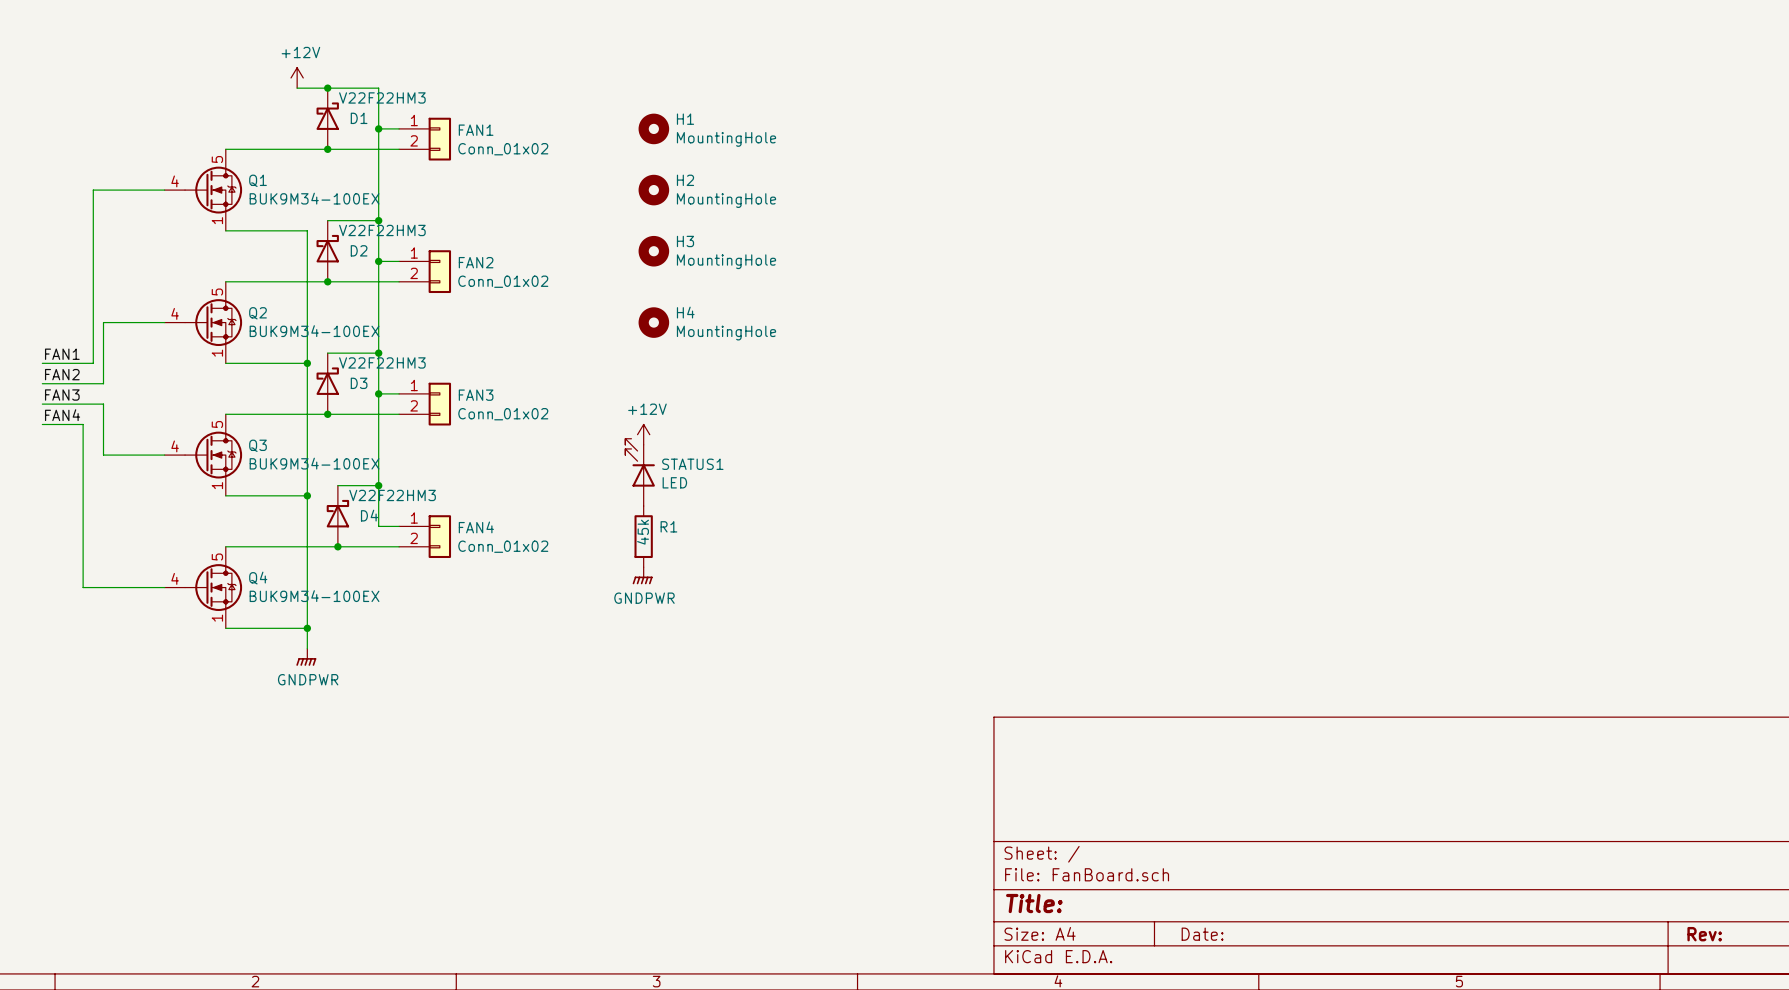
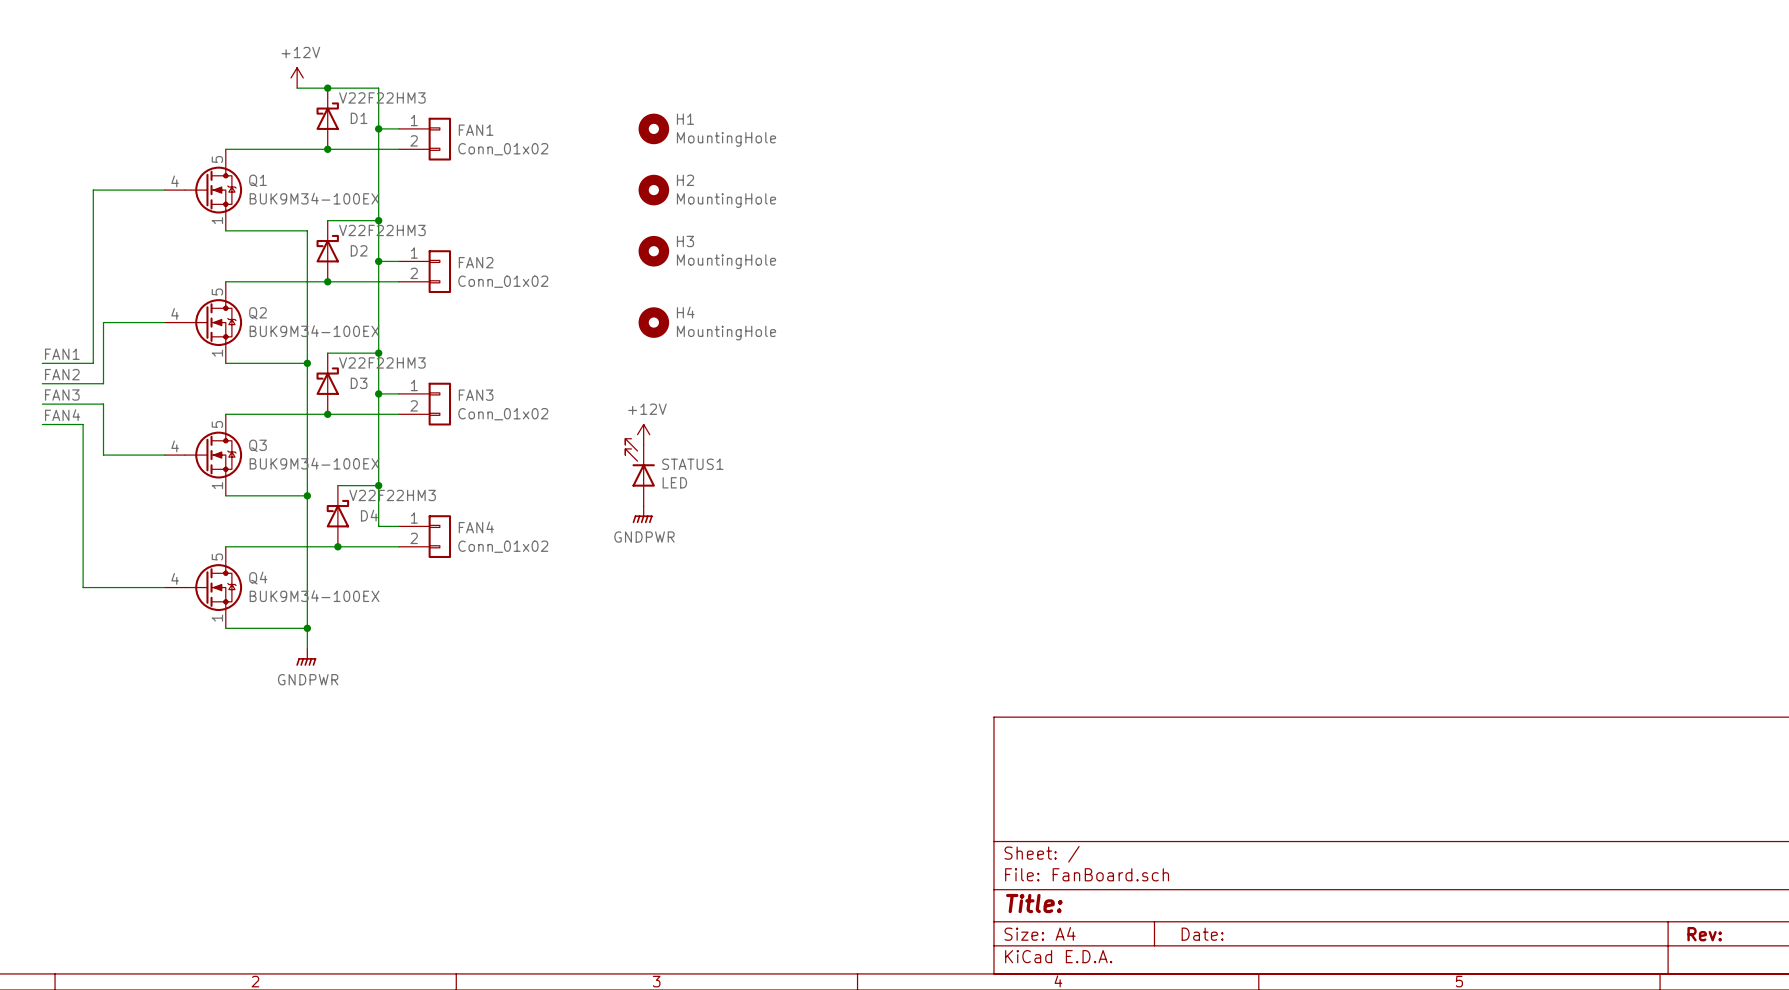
R1: 45k (643, 536) -> none
power symbol position: GNDPWR (642, 575) -> GNDPWR (642, 514)

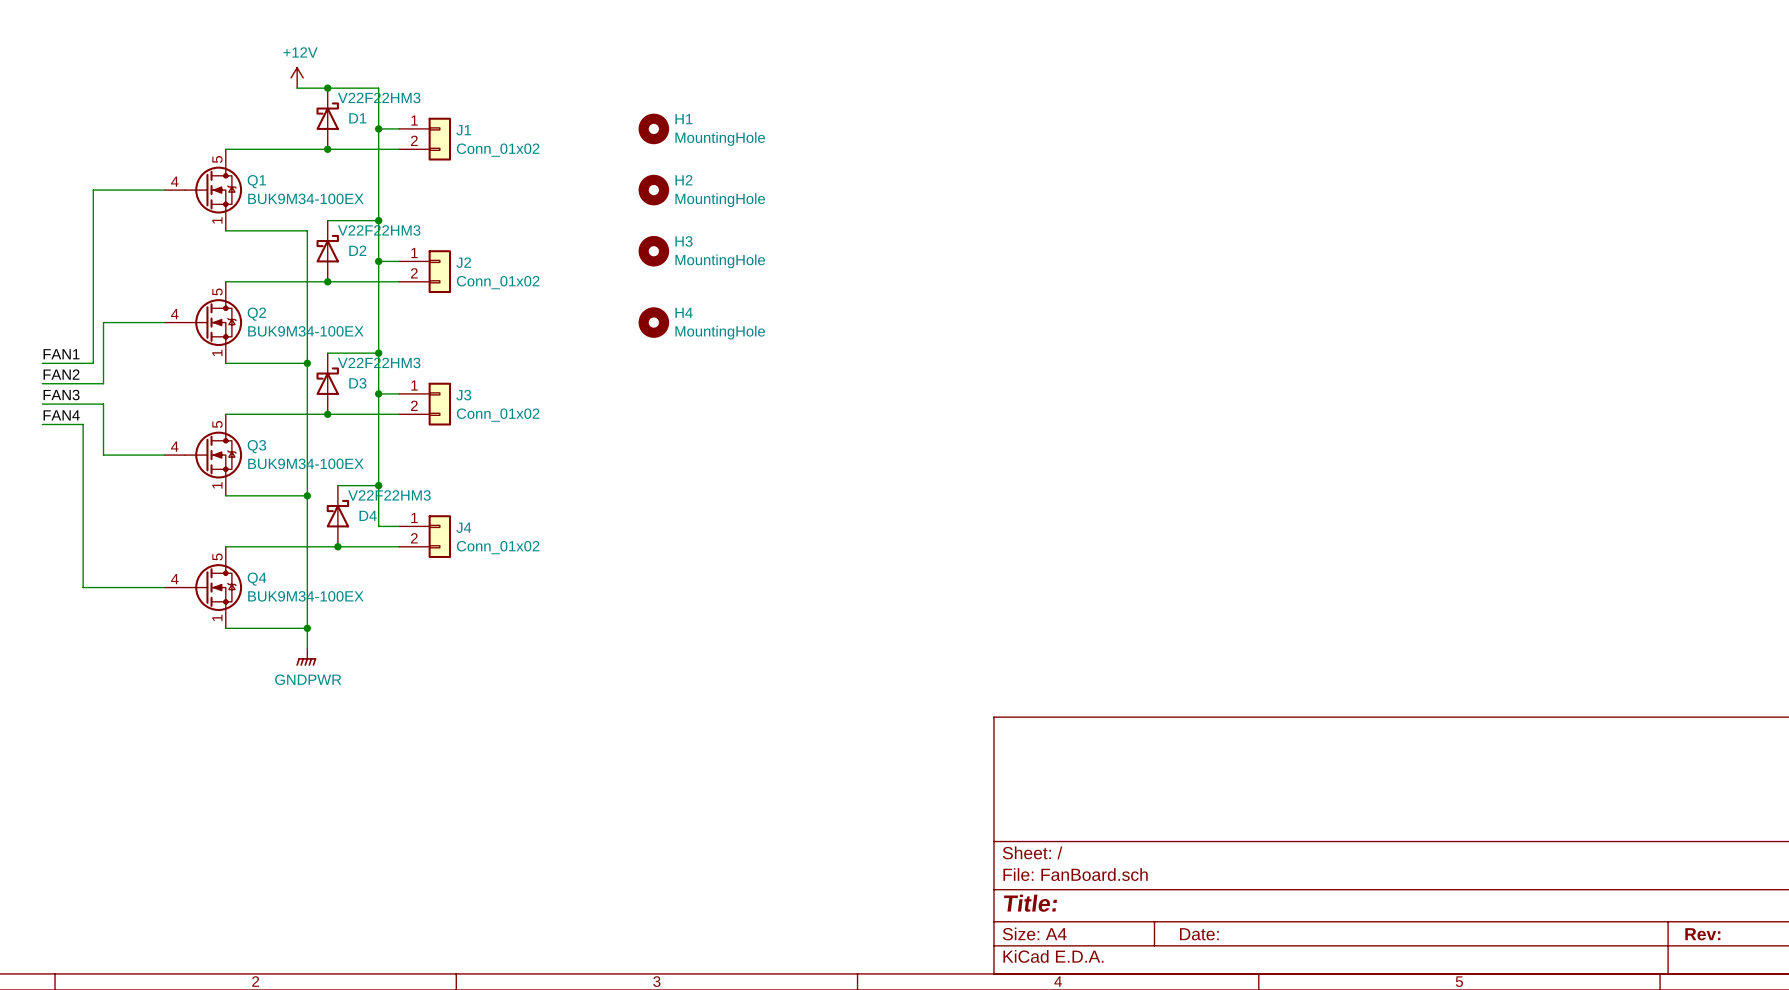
FAN1 name: FAN1 (476, 130) -> J1 (463, 130)
FAN2 name: FAN2 (476, 262) -> J2 (463, 262)
FAN3 name: FAN3 (476, 395) -> J3 (463, 395)
power symbol: +12V (643, 434) -> none
STATUS1: LED (640, 472) -> none
power symbol: GNDPWR (642, 514) -> none
FAN4 name: FAN4 (476, 527) -> J4 (463, 527)

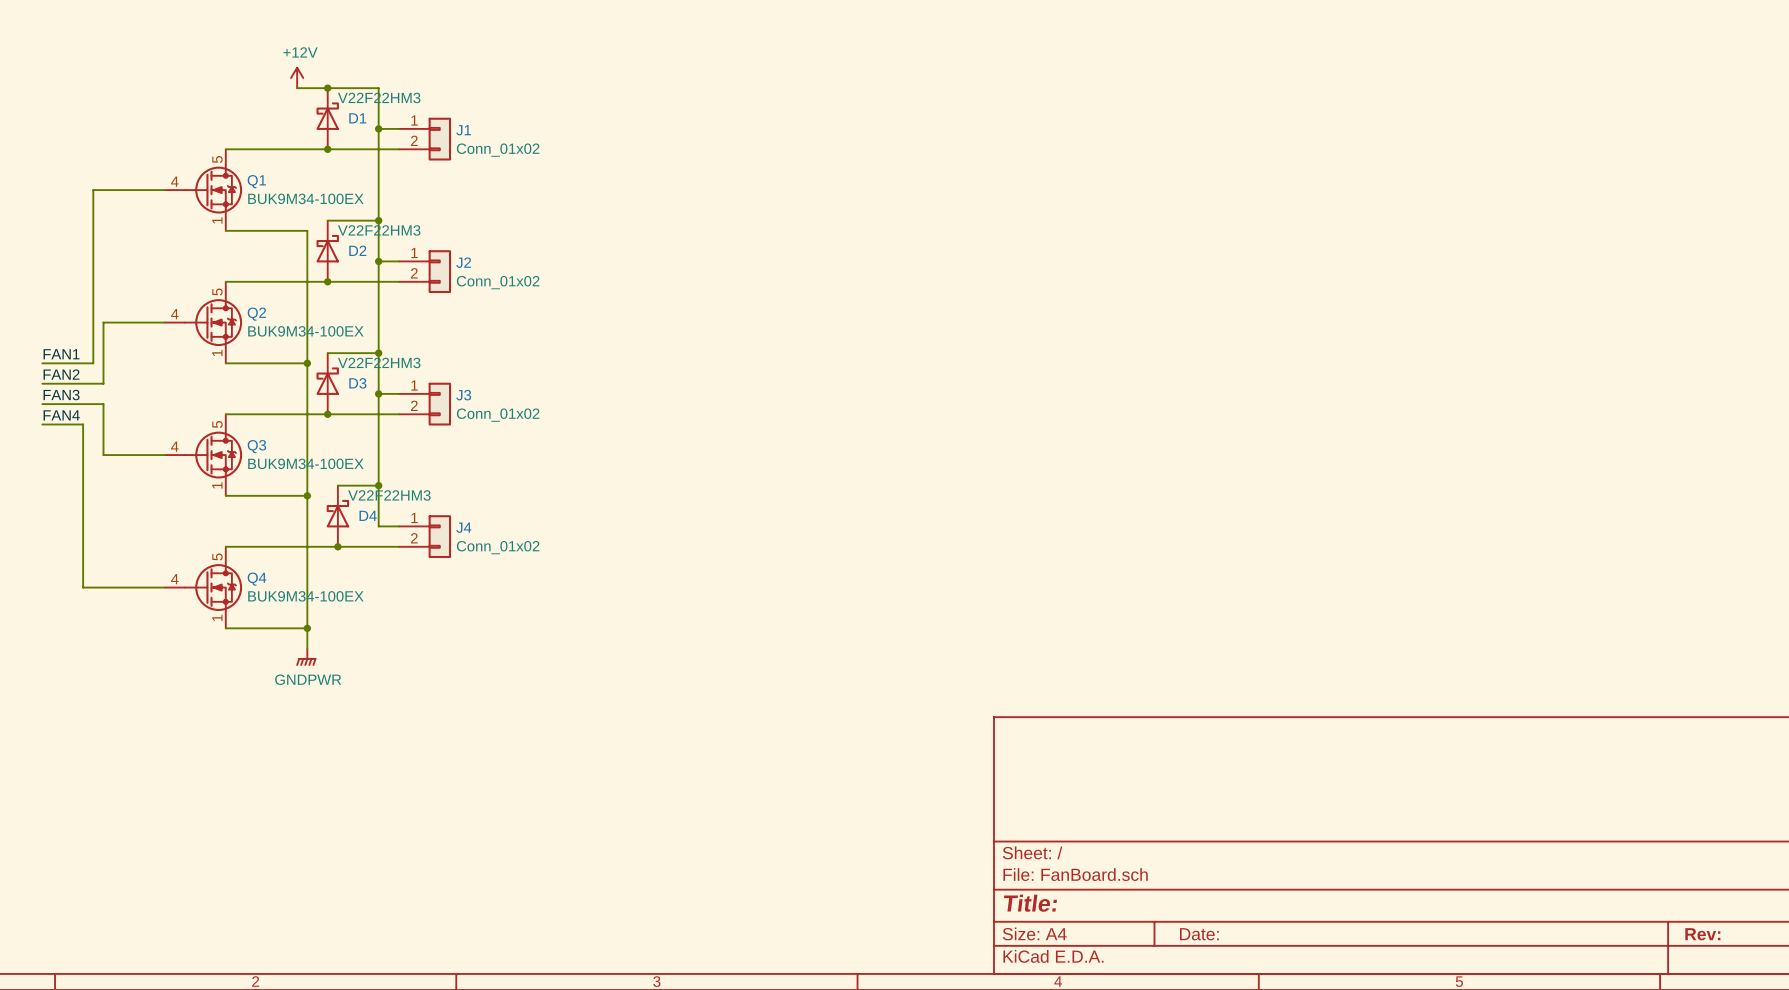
H1: MountingHole (653, 128) -> none
H2: MountingHole (653, 190) -> none
H3: MountingHole (653, 251) -> none
H4: MountingHole (653, 322) -> none

